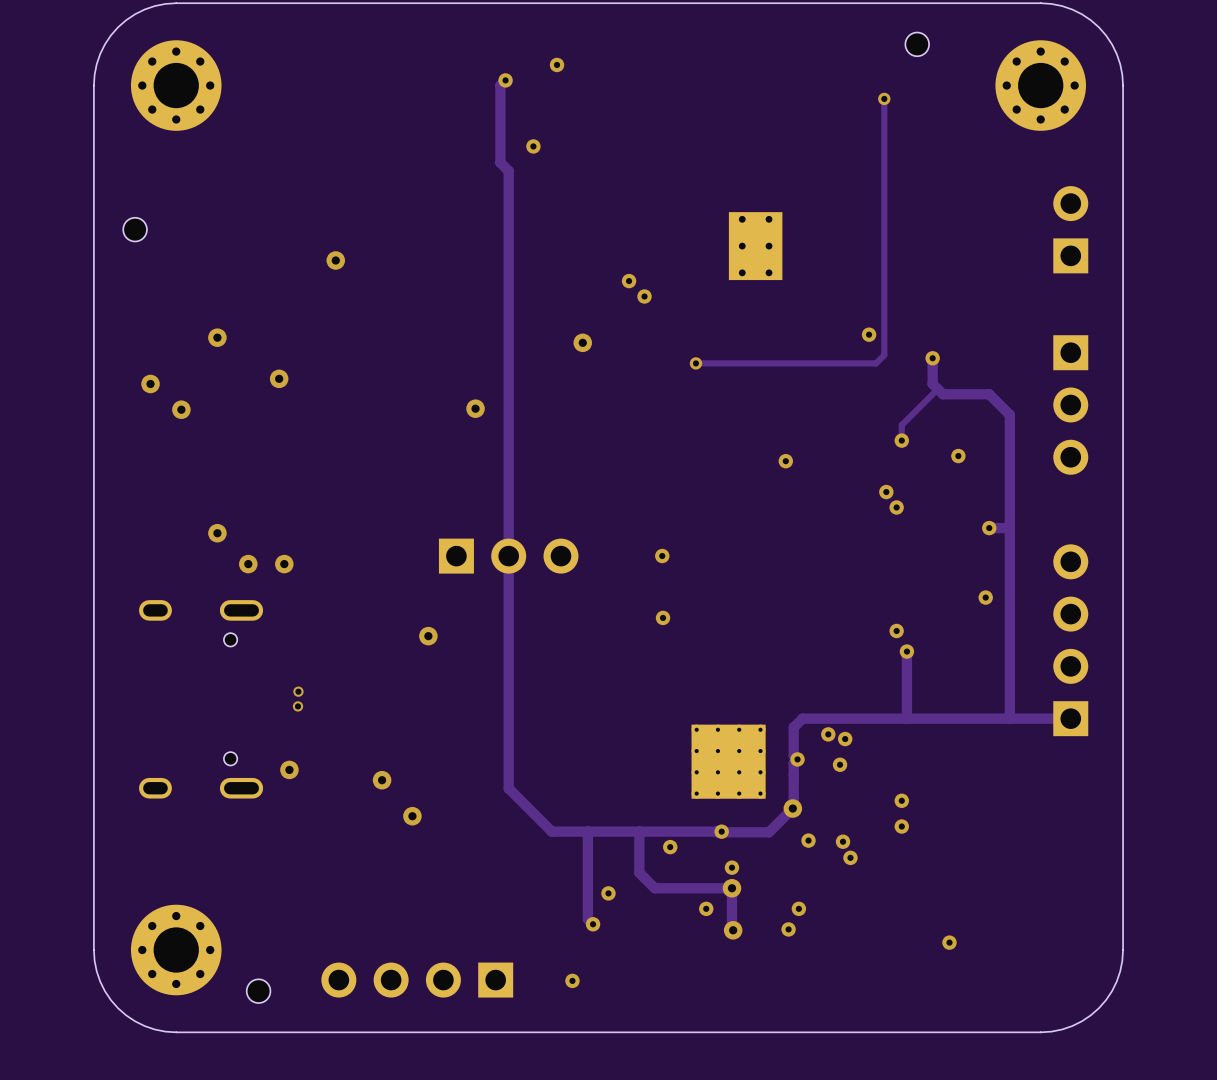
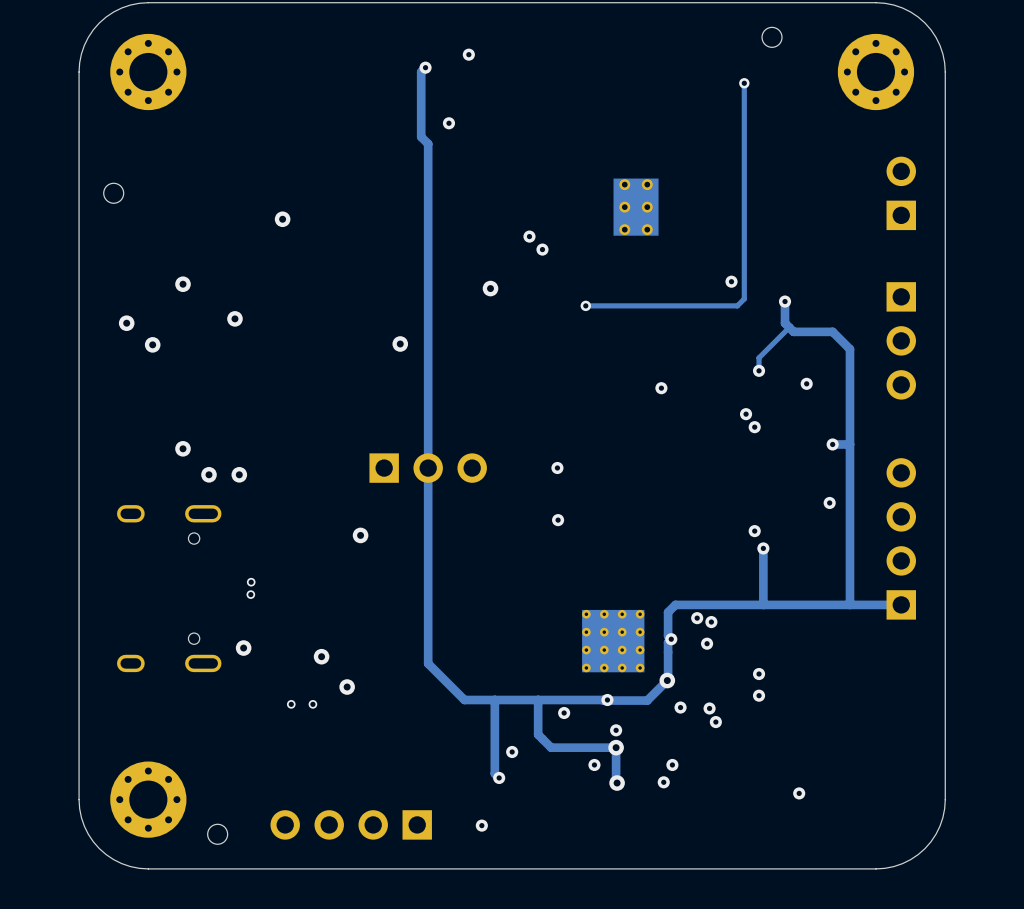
via: none -> (291, 704)
via: none -> (312, 704)

